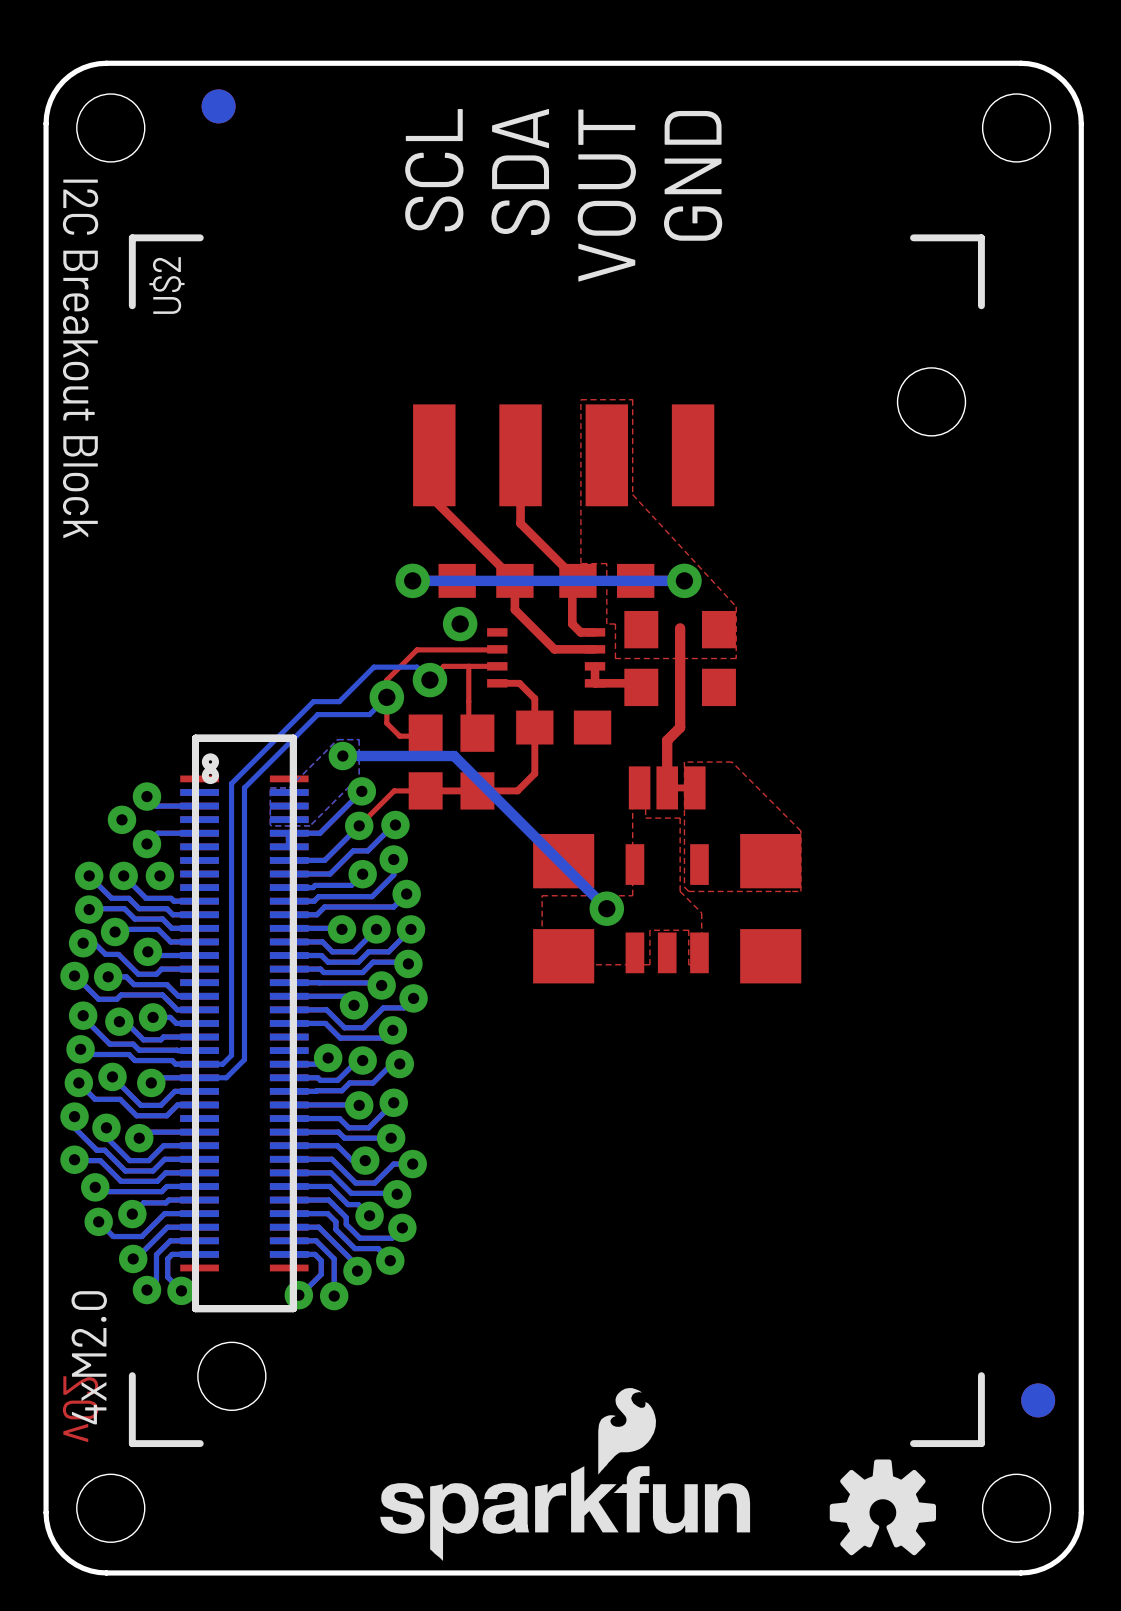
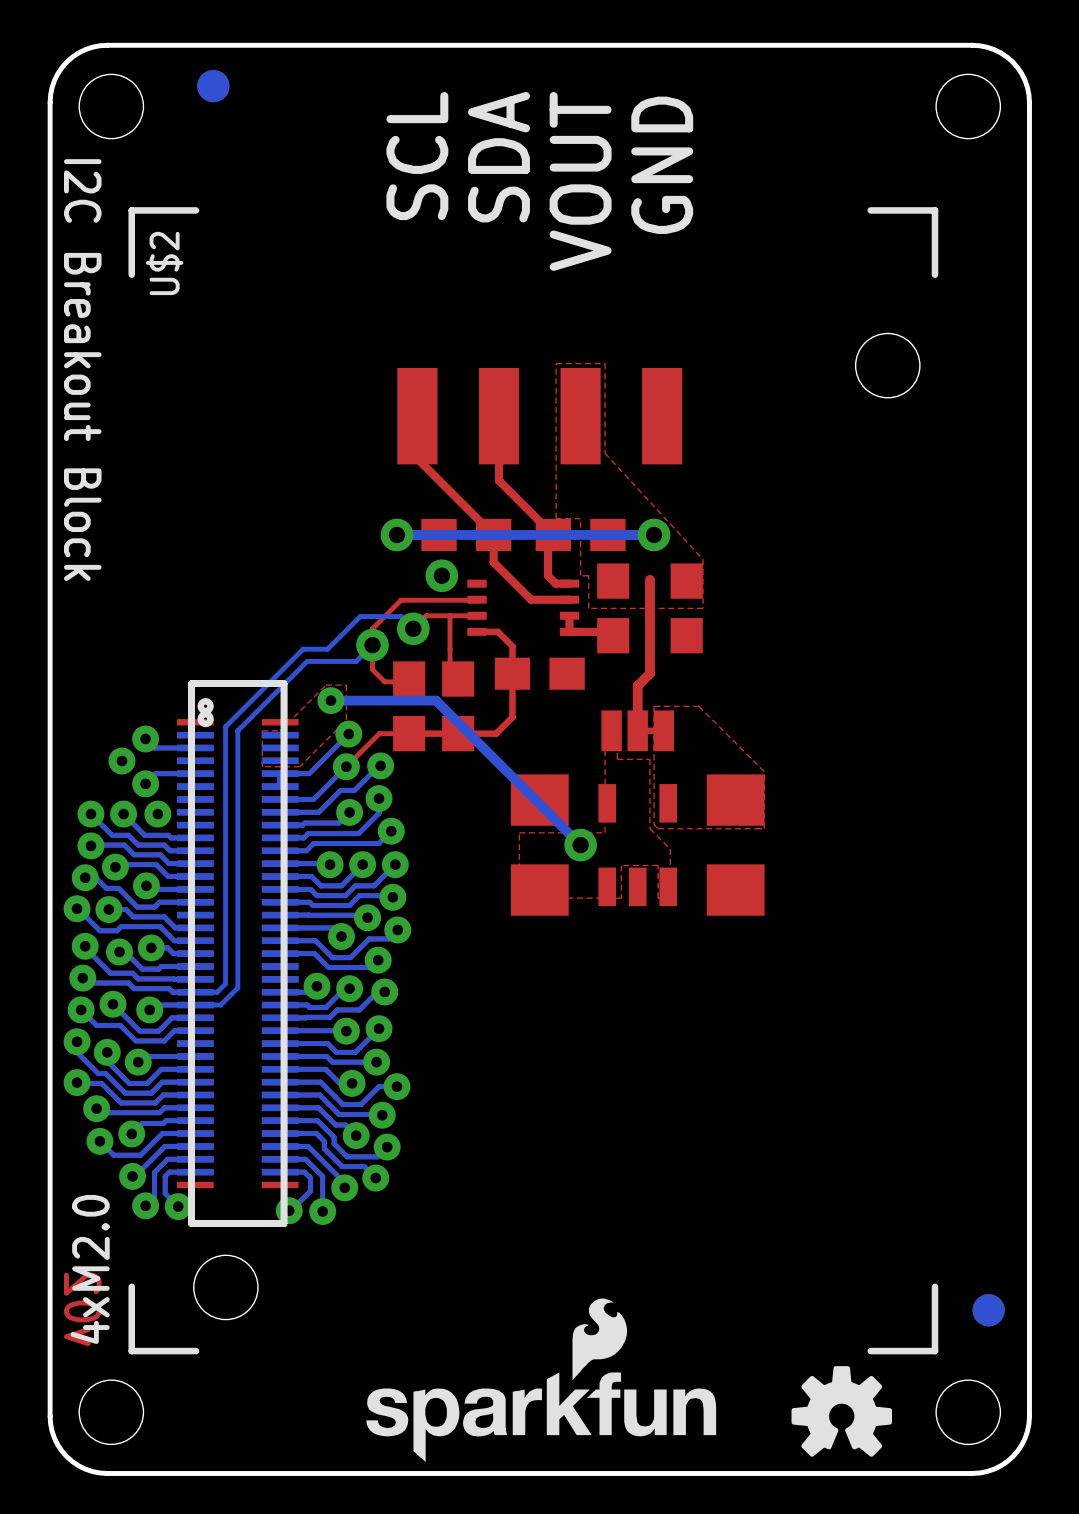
bottom zone outline: (359, 739) (337, 739) (289, 787) (270, 787) (270, 825) (310, 825) (349, 786) (359, 786) (359, 739) -> none

